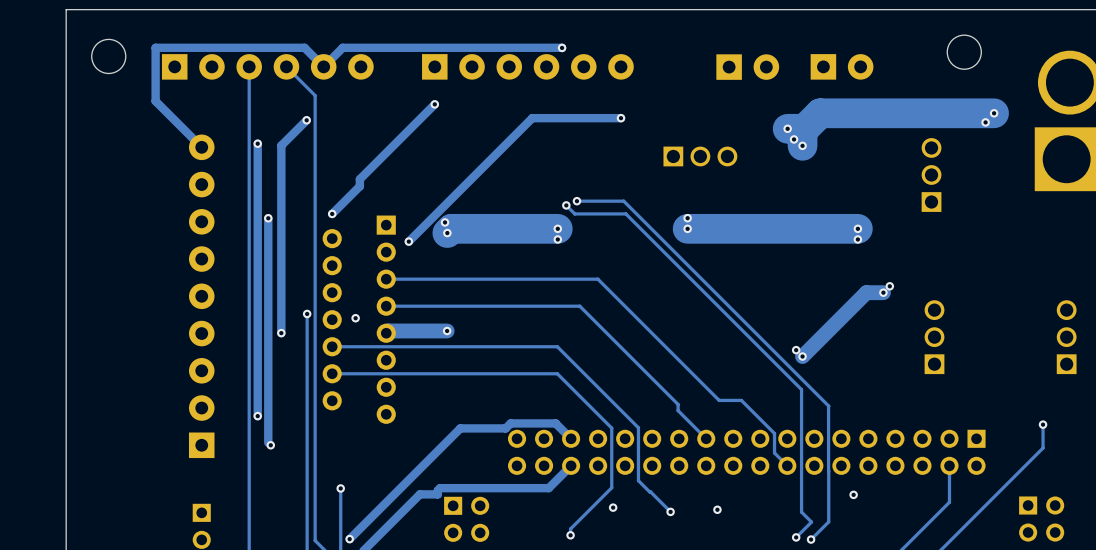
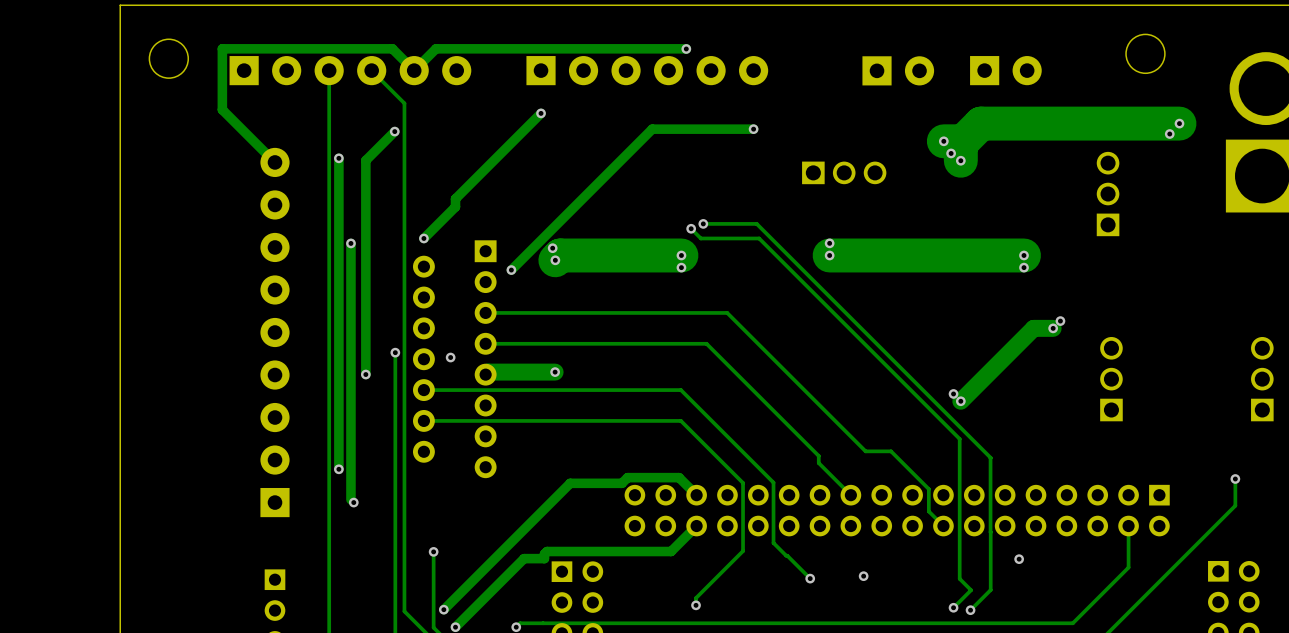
via: (613, 507) -> none

